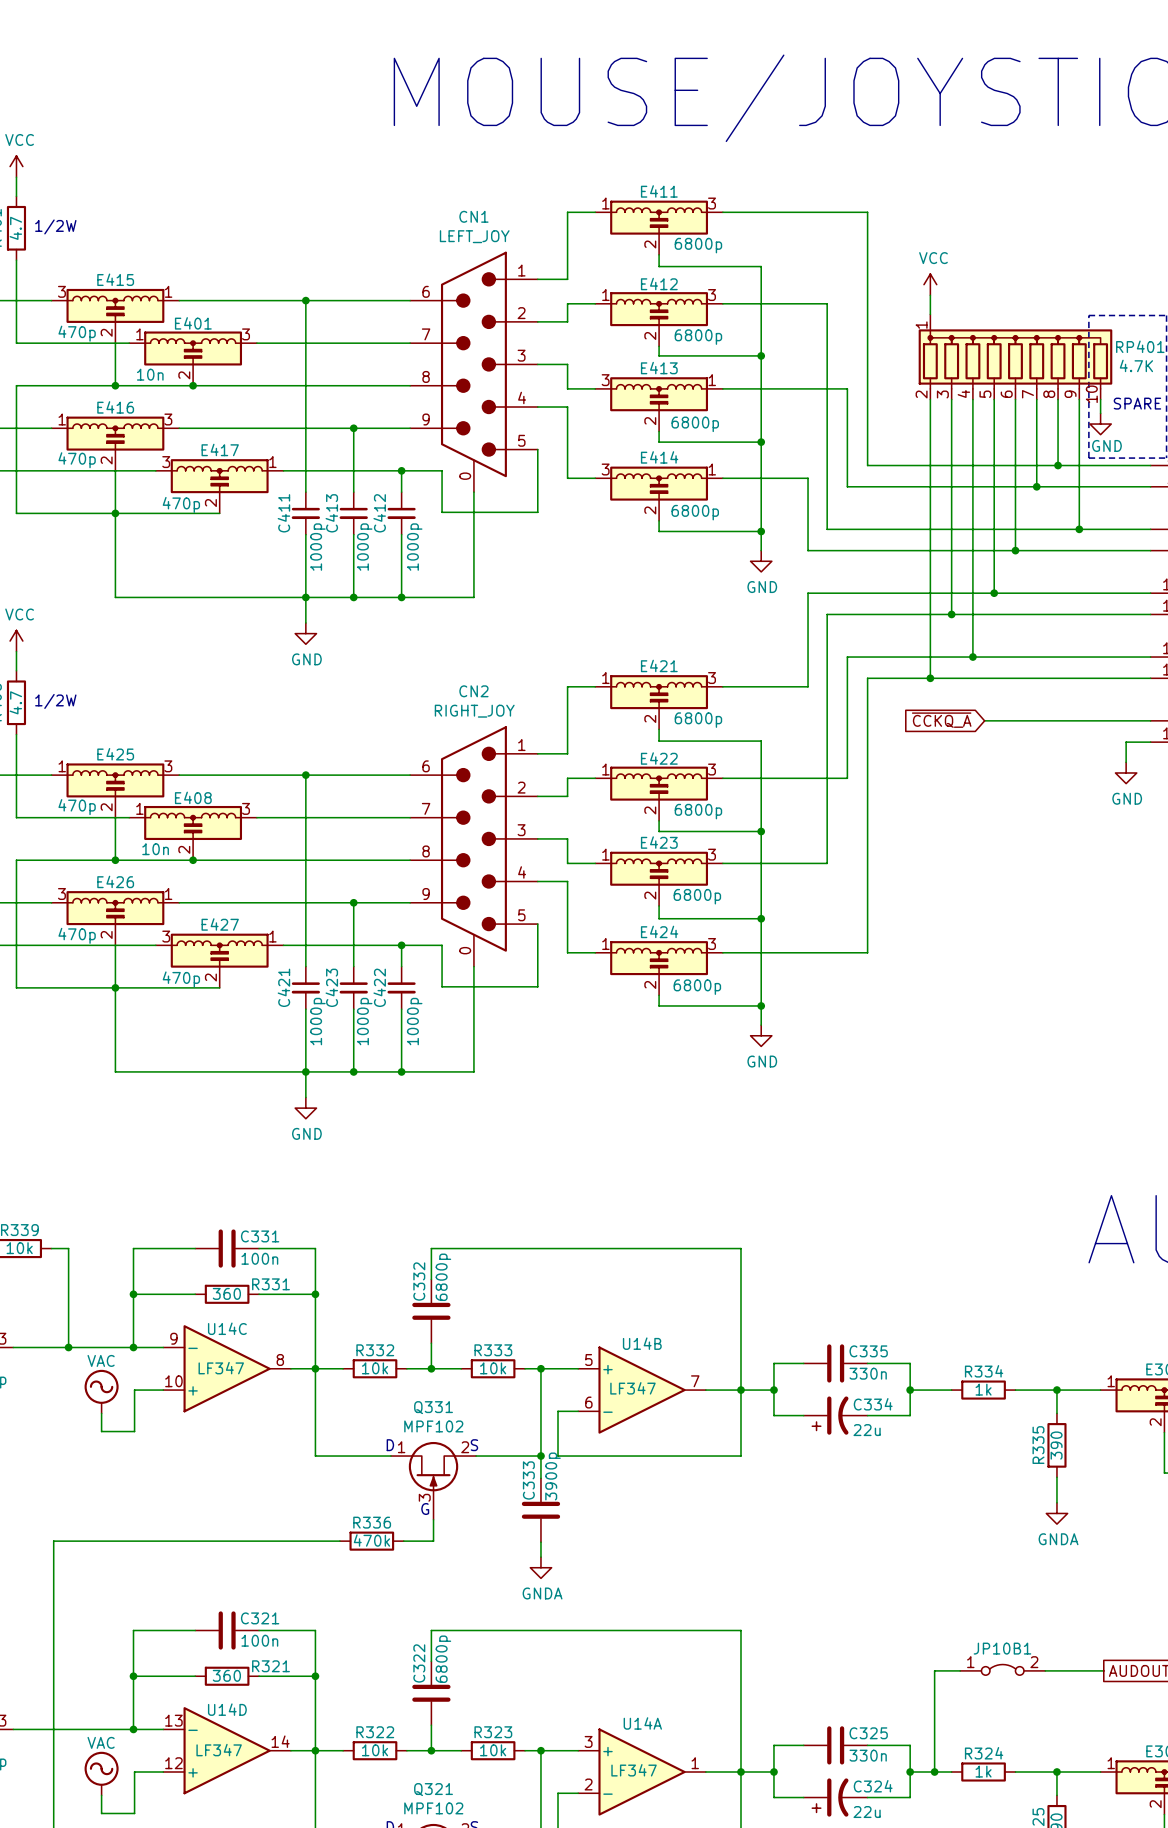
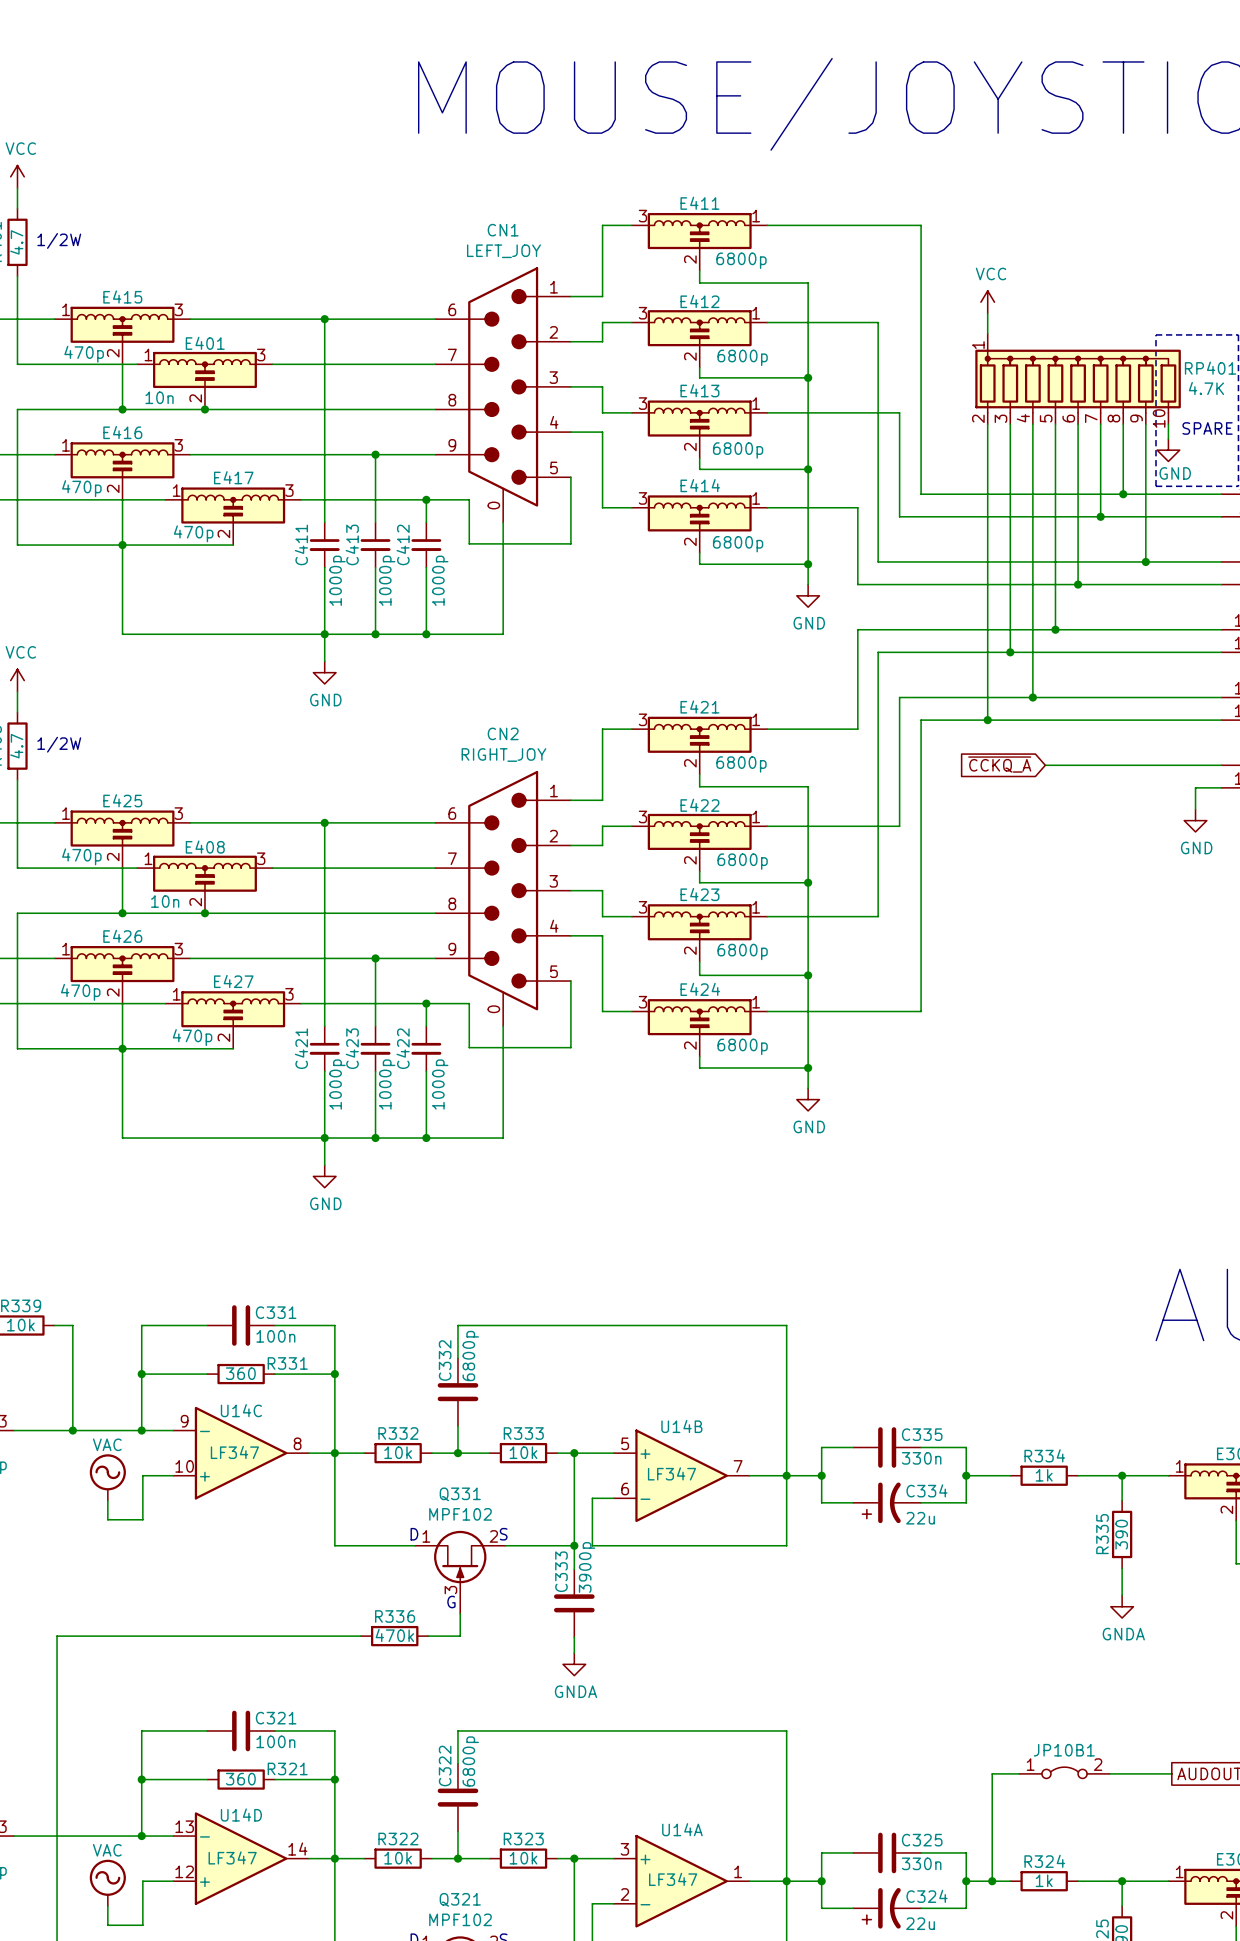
E411 flip: as is (659, 217) -> left-right (699, 231)
E415 flip: as is (115, 305) -> left-right (122, 324)
E412 flip: as is (659, 309) -> left-right (699, 328)
E417 flip: as is (219, 476) -> left-right (233, 505)
E421 flip: as is (659, 692) -> left-right (699, 734)
E422 flip: as is (659, 783) -> left-right (699, 831)
E423 flip: as is (659, 868) -> left-right (699, 922)
E426 flip: as is (115, 908) -> left-right (122, 964)
E427 flip: as is (219, 950) -> left-right (233, 1009)
E424 flip: as is (659, 958) -> left-right (699, 1017)

